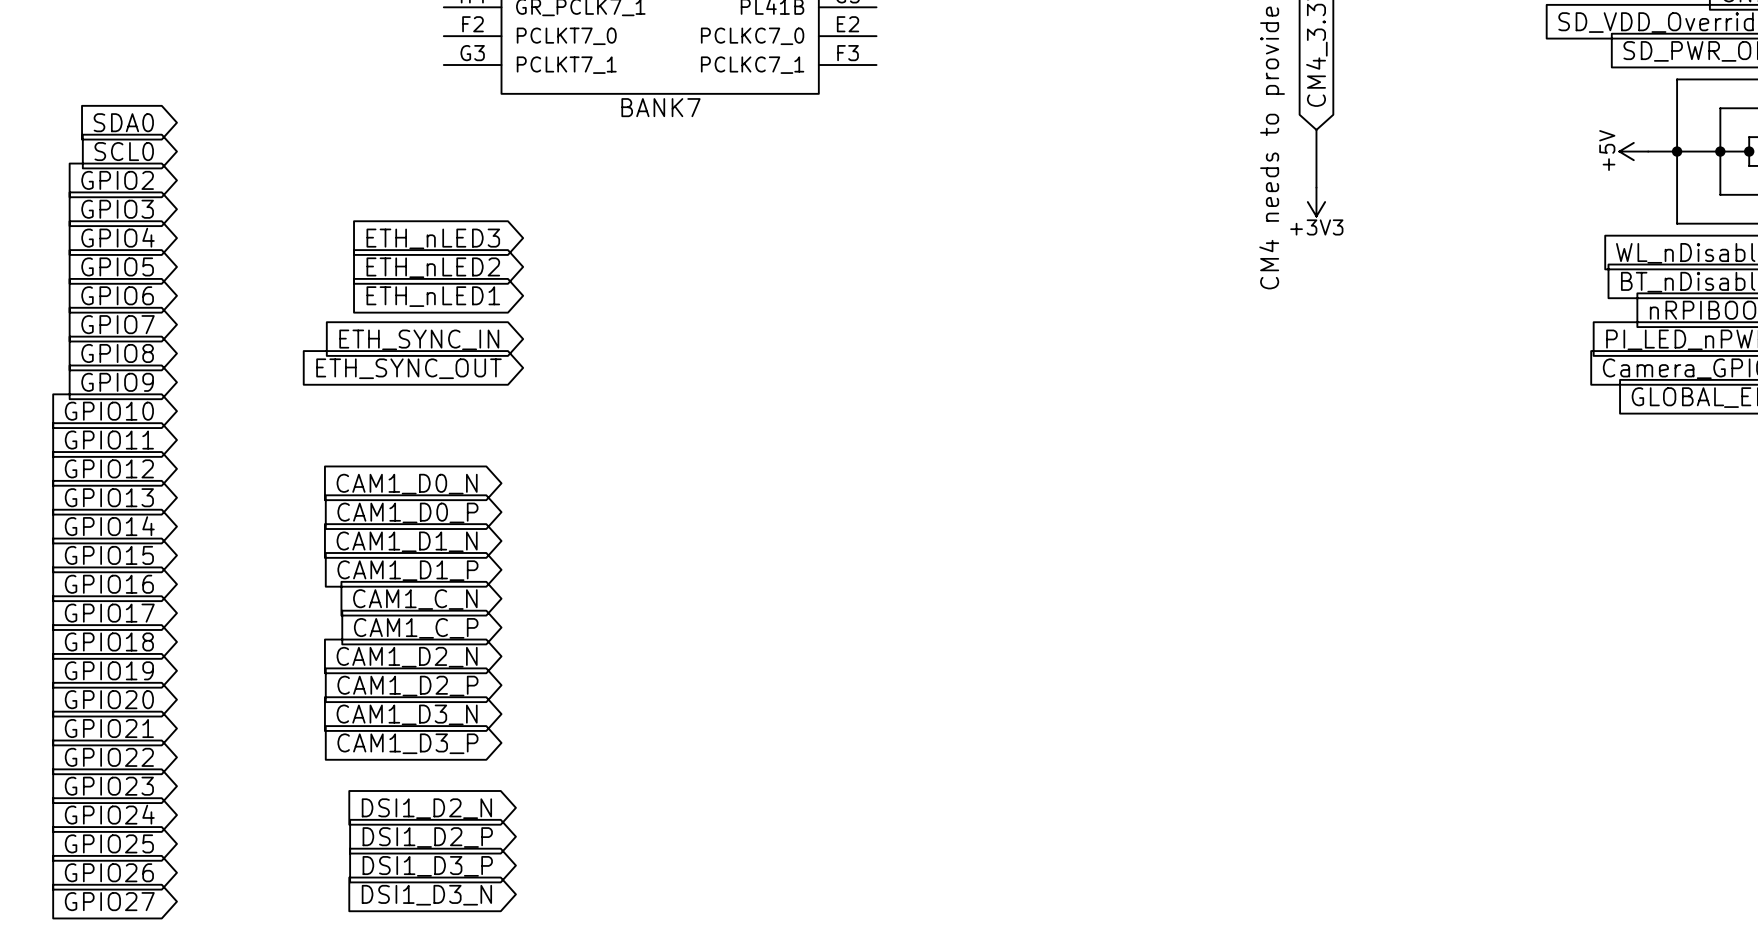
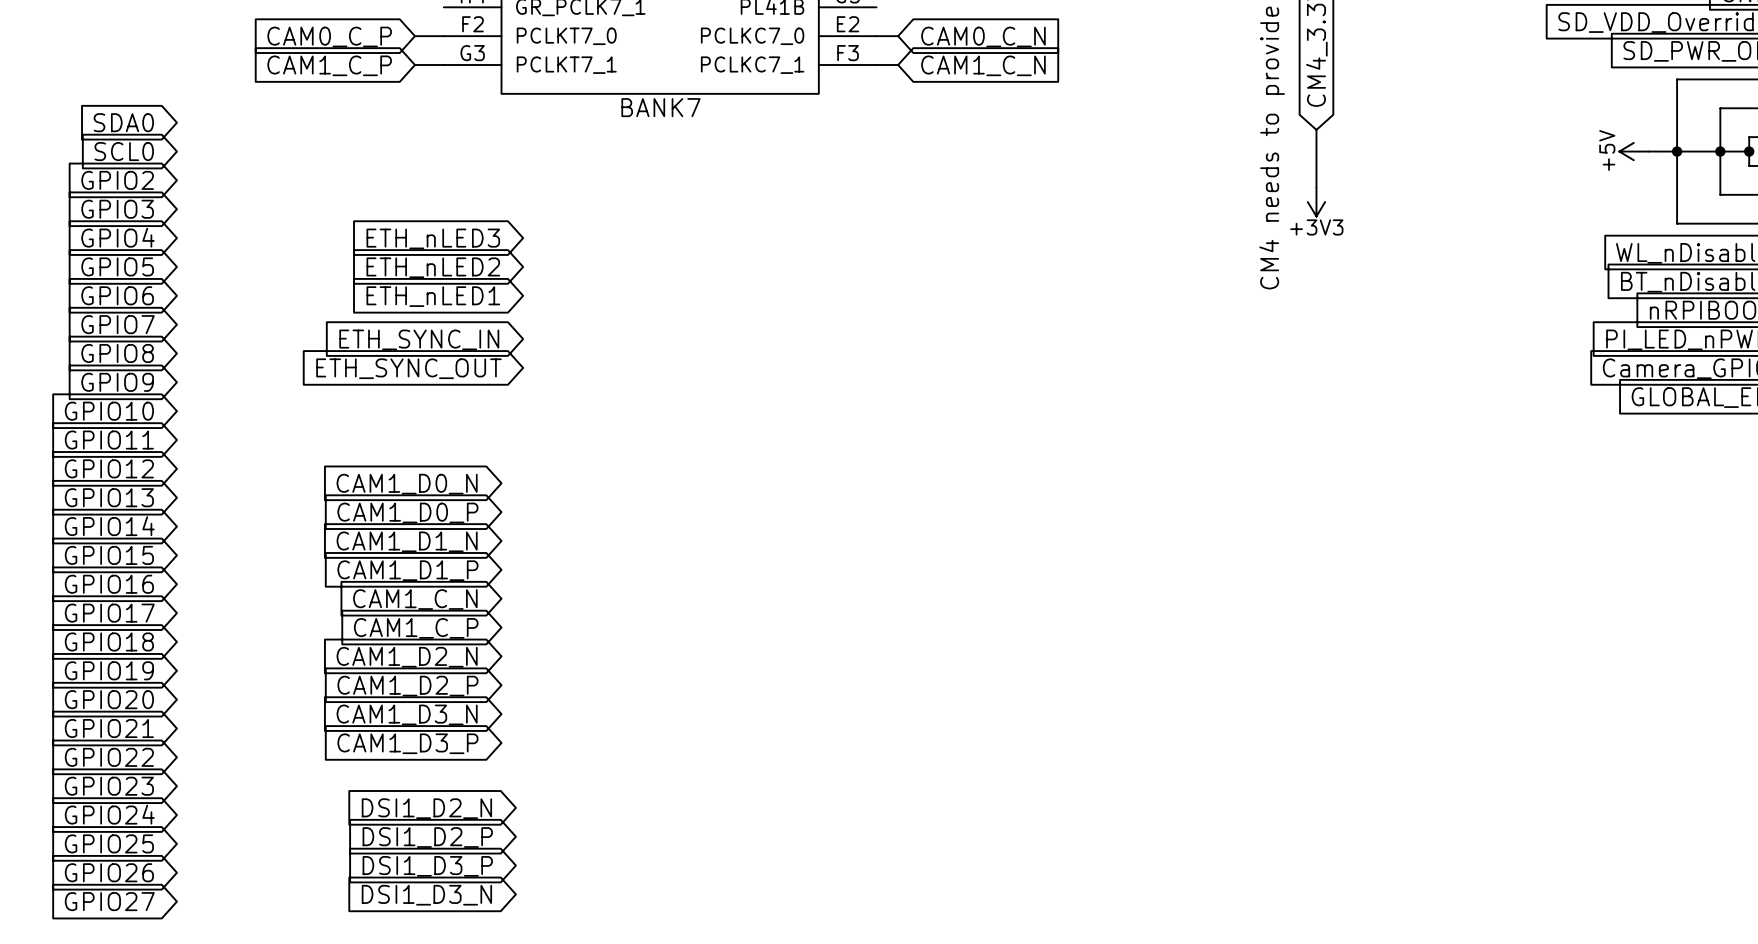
global label: none -> CAM0_C_P (329, 36)
wire: none -> (414, 36) (443, 36)
wire: none -> (876, 36) (898, 36)
global label: none -> CAM0_C_N (983, 36)
global label: none -> CAM1_C_P (329, 65)
wire: none -> (414, 65) (443, 65)
wire: none -> (876, 65) (898, 65)
global label: none -> CAM1_C_N (983, 65)

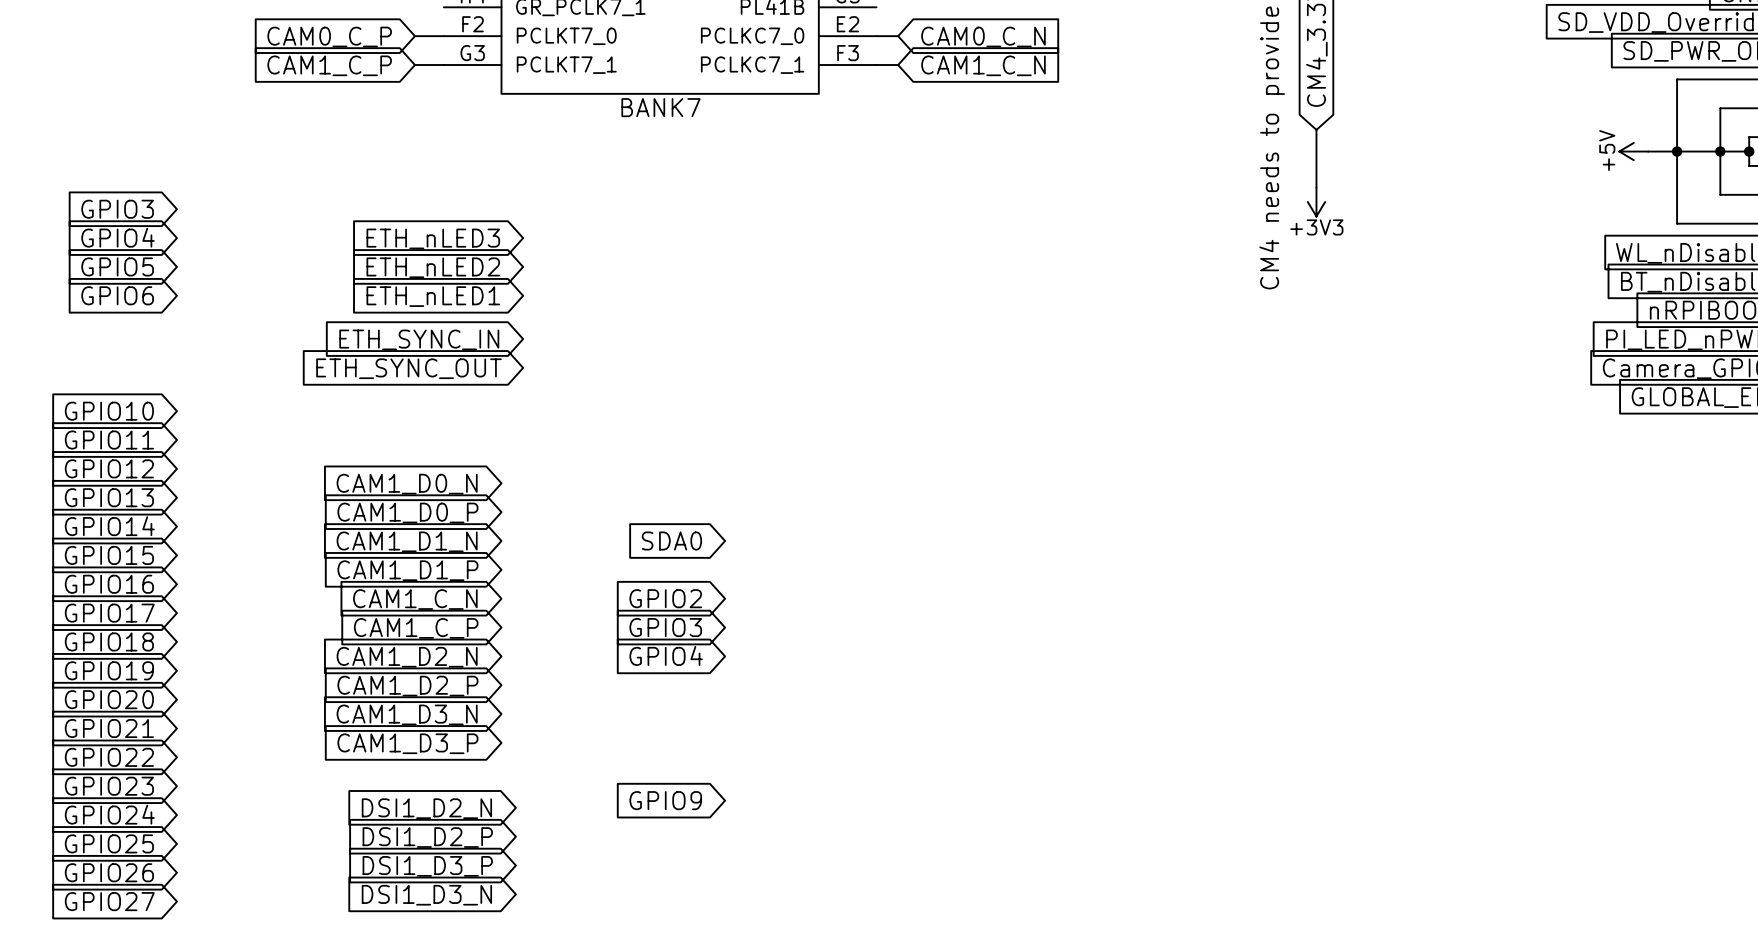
global label: SDA0 (123, 122) -> none
global label: SCL0 (124, 151) -> none
global label: GPIO2 (117, 180) -> none
global label: GPIO7 (118, 324) -> none
global label: GPIO8 (117, 353) -> none
global label: GPIO9 (117, 382) -> none
global label: none -> SDA0 (671, 541)
global label: none -> GPIO2 (665, 598)
global label: none -> GPIO3 (665, 627)
global label: none -> GPIO4 (666, 655)
global label: none -> GPIO9 (665, 800)

